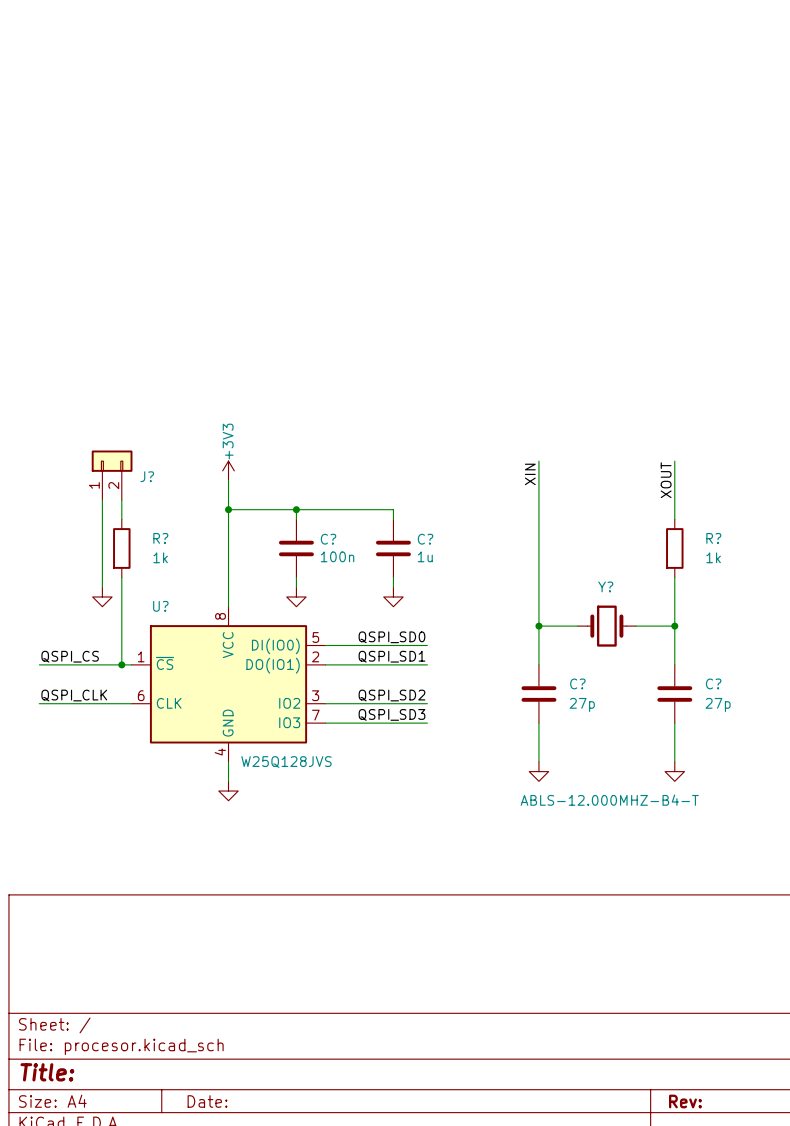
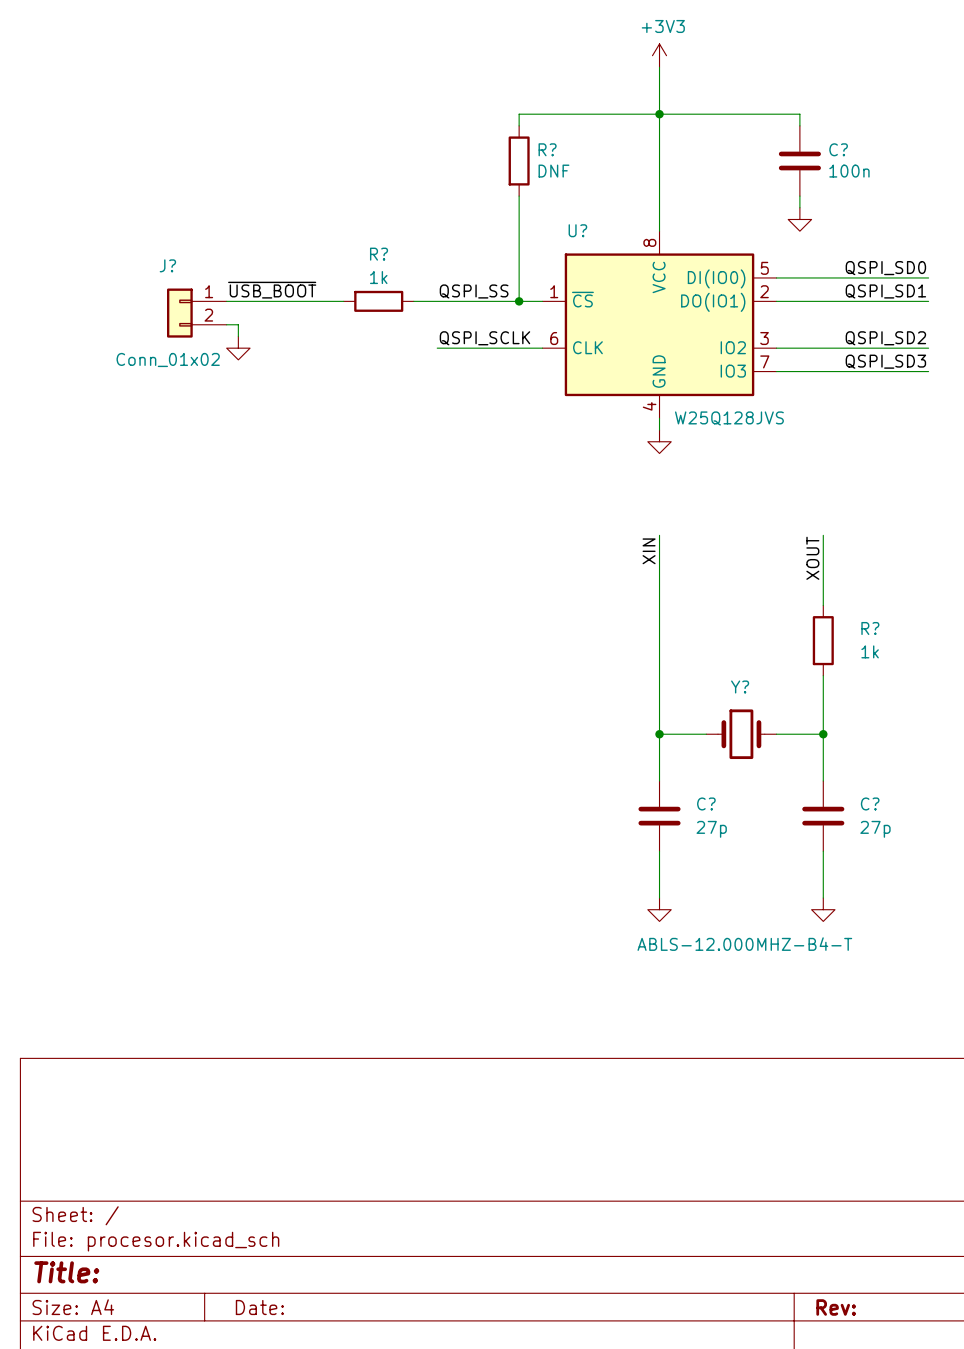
power symbol: none -> +3V3 (659, 55)
wire: none -> (659, 67) (659, 231)
junction: none -> (659, 114)
wire: none -> (519, 125) (519, 114) (799, 114) (799, 125)
R?: none -> DNF (519, 160)
C?: none -> 100n (799, 160)
wire: none -> (519, 196) (519, 301)
wire: none -> (799, 196) (799, 207)
power symbol: none -> (799, 219)
label: none -> QSPI_SD0 (885, 268)
wire: none -> (776, 277) (928, 277)
label: none -> ~{USB_BOOT} (272, 290)
label: none -> QSPI_SS (474, 291)
label: none -> QSPI_SD1 (885, 291)
wire: none -> (226, 301) (343, 301)
R?: none -> 1k (378, 301)
wire: none -> (413, 301) (542, 301)
junction: none -> (519, 301)
wire: none -> (776, 301) (928, 301)
J?: none -> Conn_01x02 (196, 313)
wire: none -> (226, 324) (238, 324) (238, 336)
U?: none -> W25Q128JVS (659, 324)
label: none -> QSPI_SCLK (484, 338)
label: none -> QSPI_SD2 (885, 338)
power symbol: none -> (238, 348)
wire: none -> (437, 348) (542, 348)
wire: none -> (776, 348) (928, 348)
label: none -> QSPI_SD3 (885, 361)
wire: none -> (776, 371) (928, 371)
wire: none -> (659, 418) (659, 430)
power symbol: none -> (659, 441)
power symbol: +3V3 (228, 470) -> none
J?: (112, 475) -> none
wire: (228, 480) (228, 606) -> none
wire: (102, 499) (102, 587) -> none
wire: (121, 499) (121, 519) -> none
wire: (228, 509) (393, 509) (393, 519) -> none
junction: (228, 509) -> none
wire: (296, 509) (296, 519) -> none
junction: (296, 509) -> none
R?: 1k (121, 548) -> none
C?: 100n (296, 548) -> none
C?: 1u (393, 548) -> none
wire: (121, 577) (121, 664) -> none
wire: (296, 577) (296, 587) -> none
wire: (393, 577) (393, 587) -> none
power symbol: (102, 596) -> none
power symbol: (296, 596) -> none
power symbol: (393, 596) -> none
label: QSPI_SD0 (391, 637) -> none
wire: (325, 645) (427, 645) -> none
label: QSPI_CS (70, 656) -> none
label: QSPI_SD1 (391, 656) -> none
wire: (39, 664) (131, 664) -> none
junction: (121, 664) -> none
wire: (325, 664) (427, 664) -> none
U?: W25Q128JVS (228, 684) -> none
label: QSPI_CLK (74, 695) -> none
label: QSPI_SD2 (391, 695) -> none
wire: (39, 703) (131, 703) -> none
wire: (325, 703) (427, 703) -> none
label: QSPI_SD3 (391, 714) -> none
wire: (325, 723) (427, 723) -> none
wire: (228, 761) (228, 781) -> none
power symbol: (228, 791) -> none

